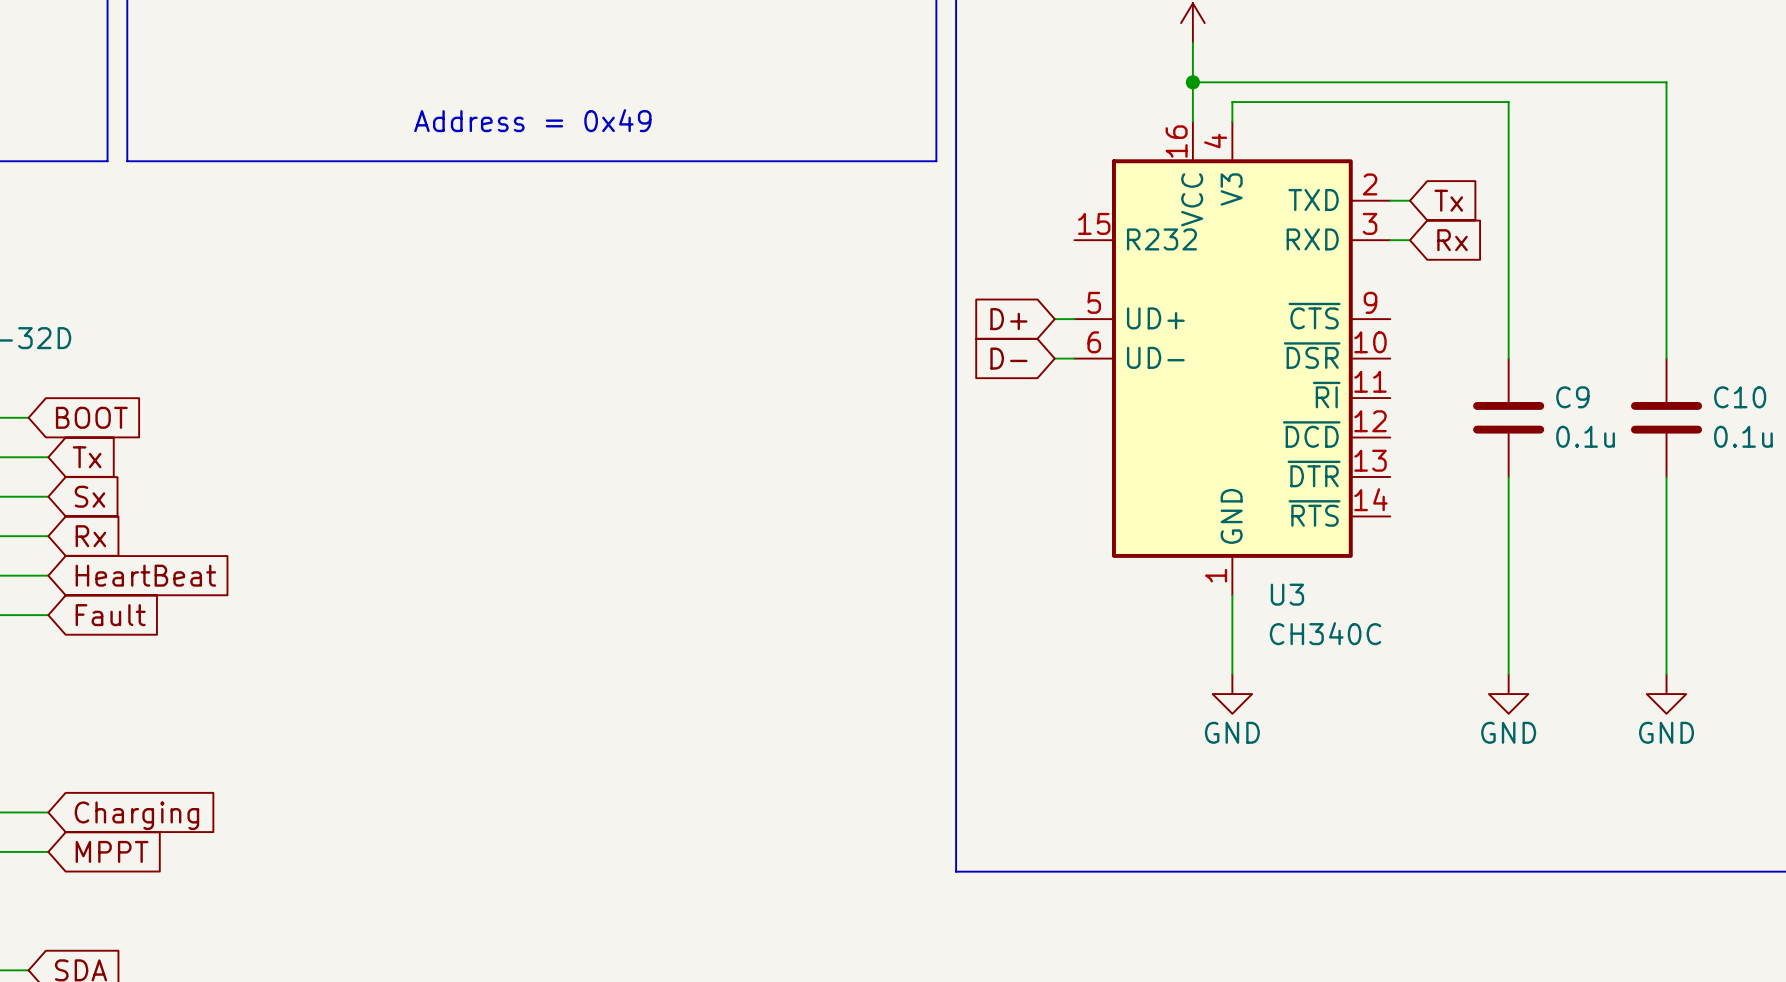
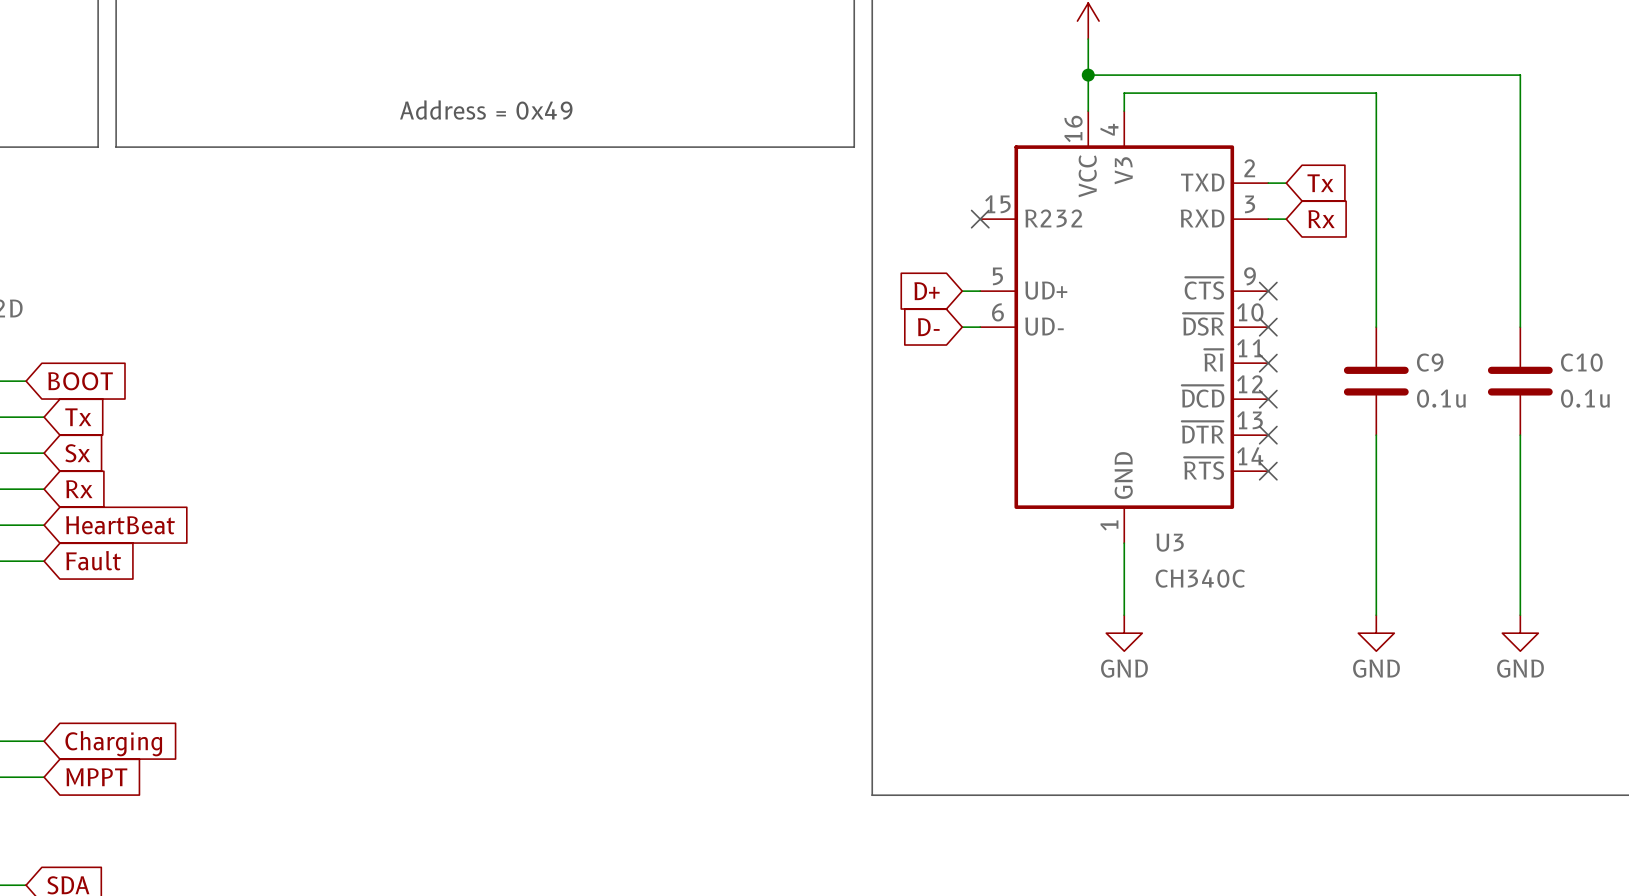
no-connect mark: none -> (980, 219)
no-connect mark: none -> (1268, 291)
no-connect mark: none -> (1268, 327)
no-connect mark: none -> (1268, 363)
no-connect mark: none -> (1268, 399)
no-connect mark: none -> (1268, 435)
no-connect mark: none -> (1268, 471)

